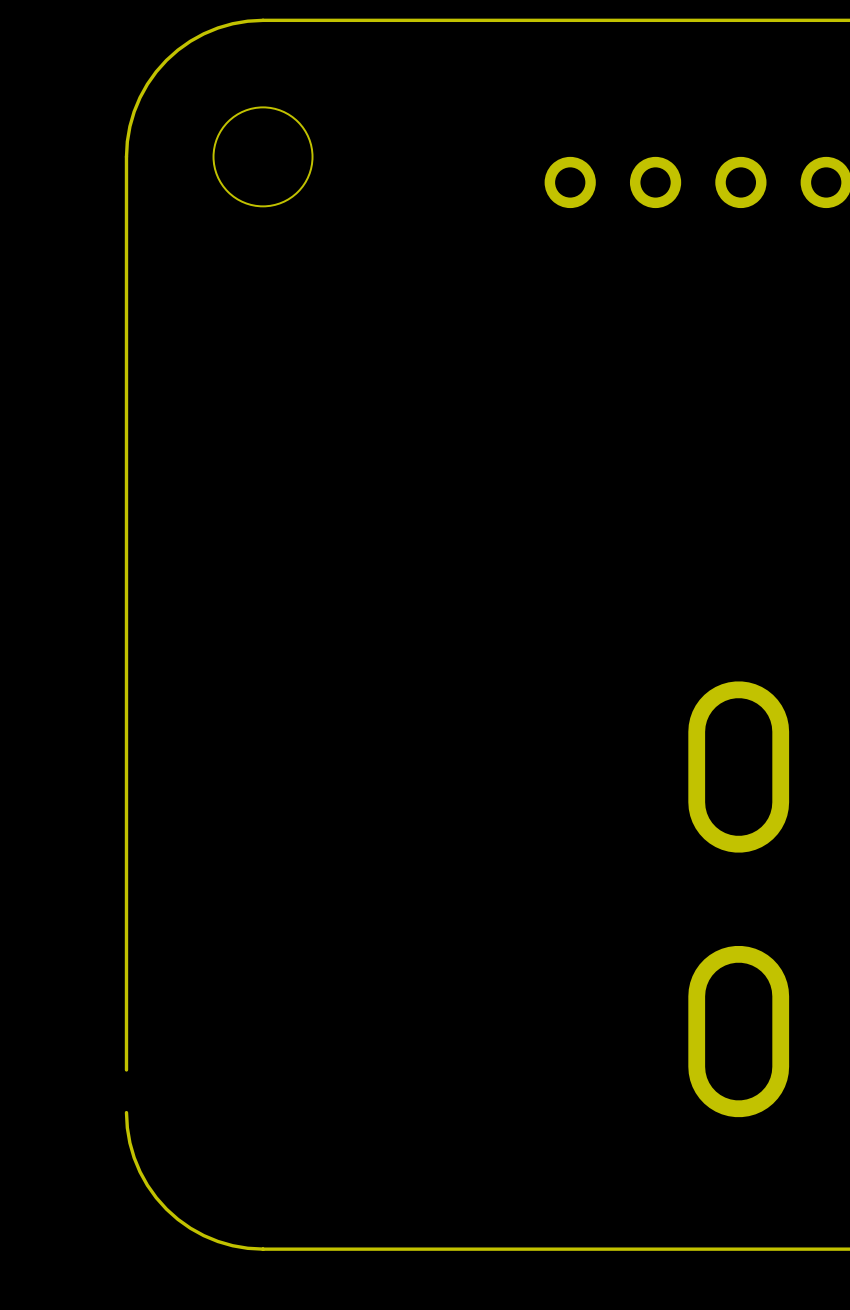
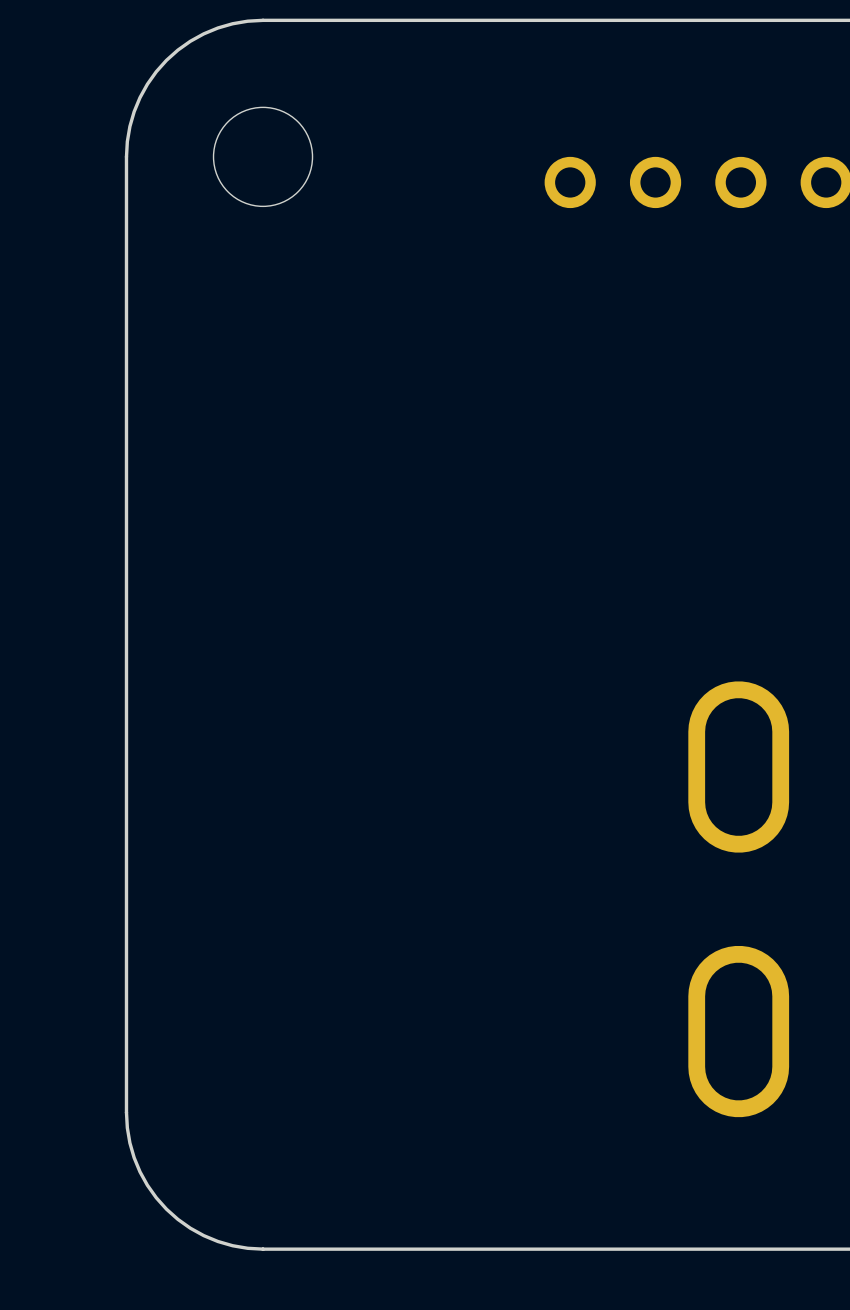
board edge: none -> (126, 1069) (126, 1112)

